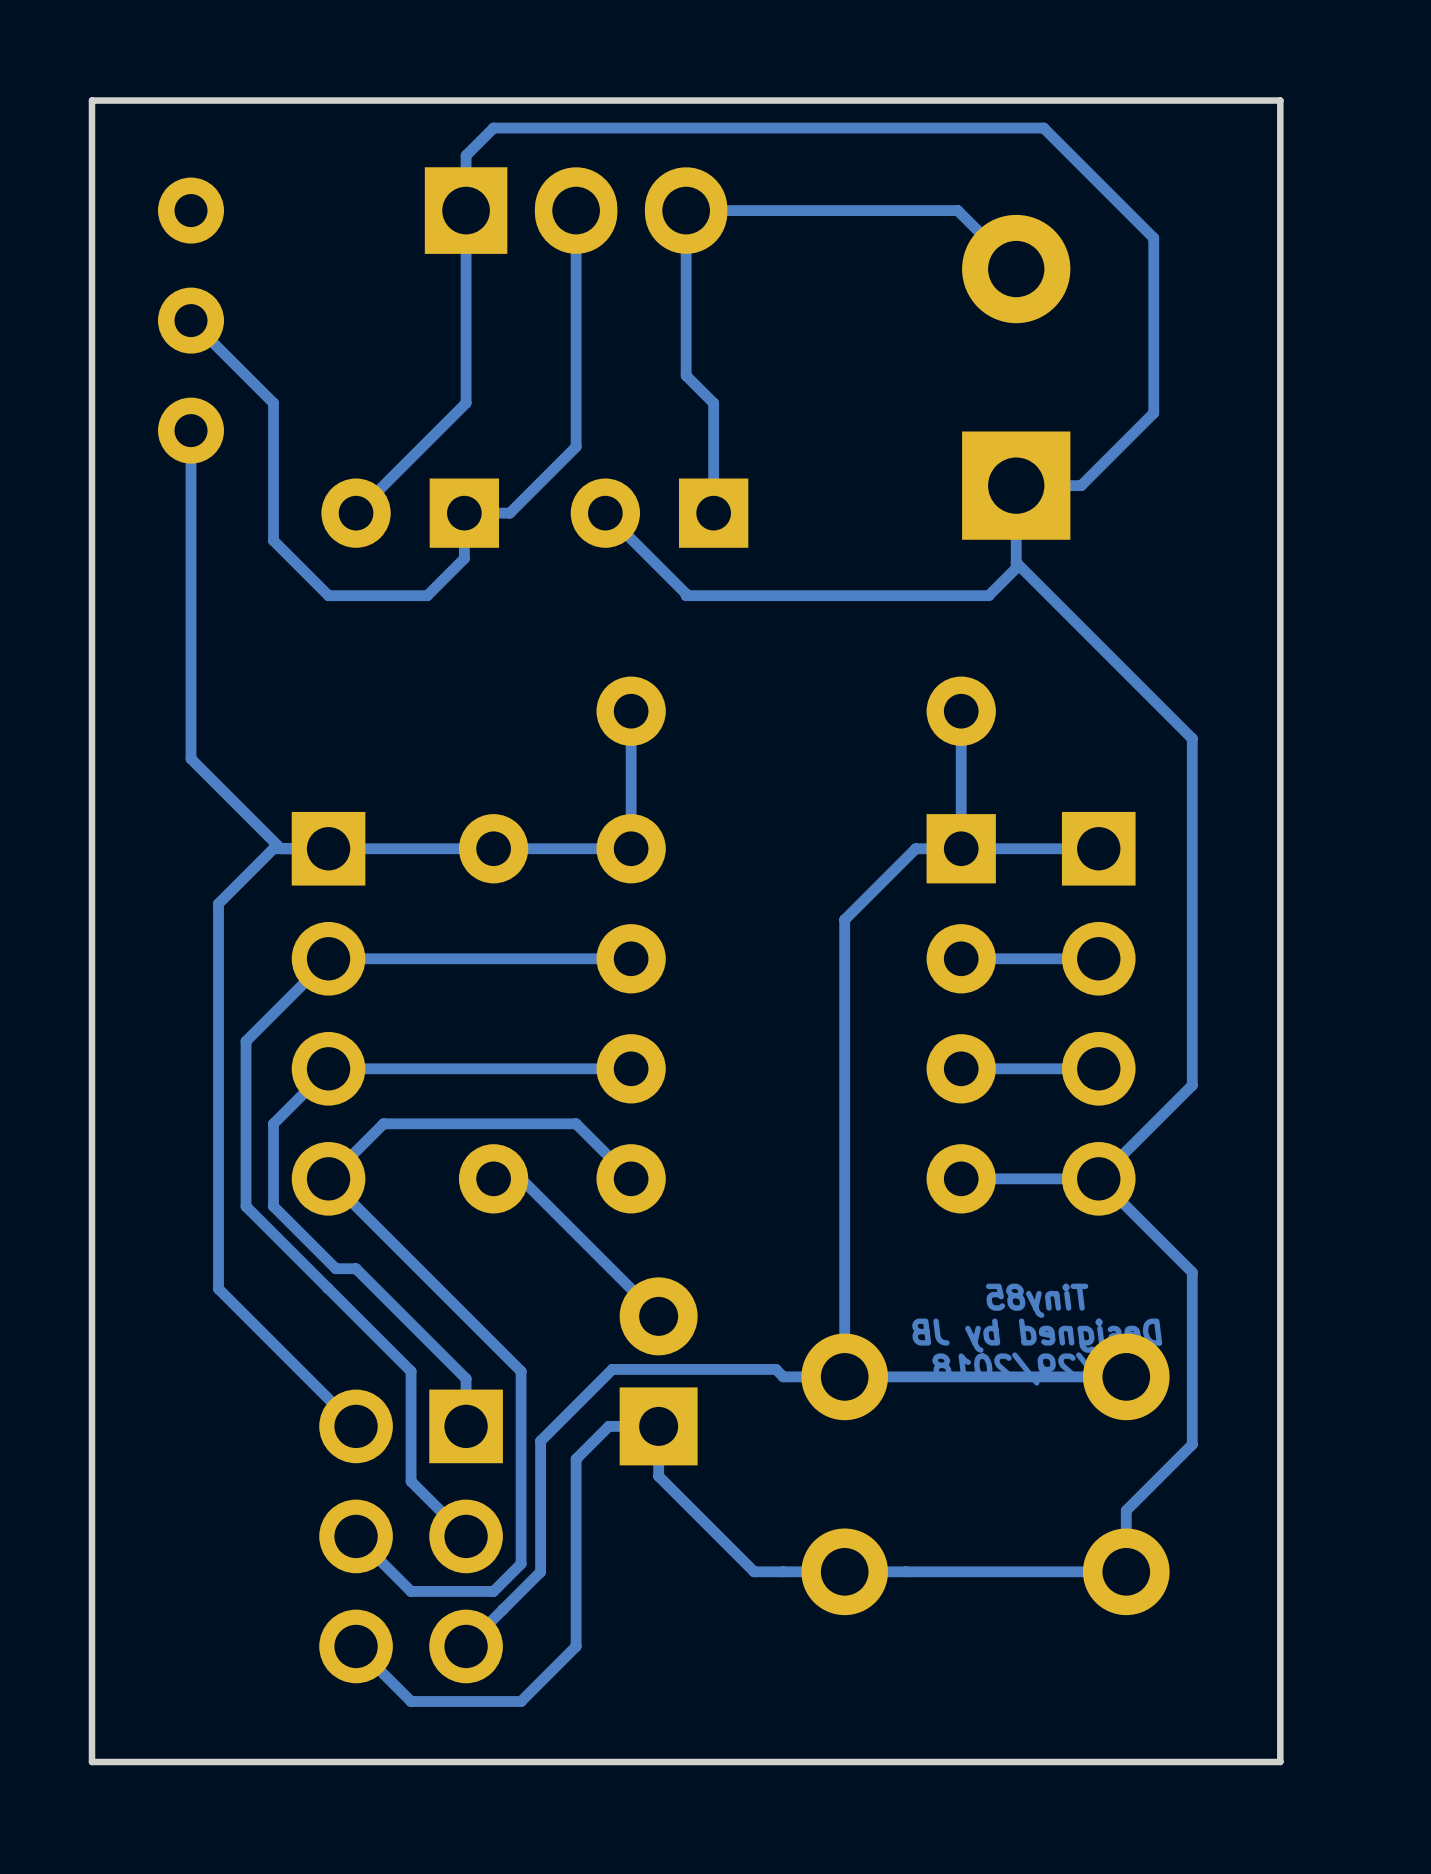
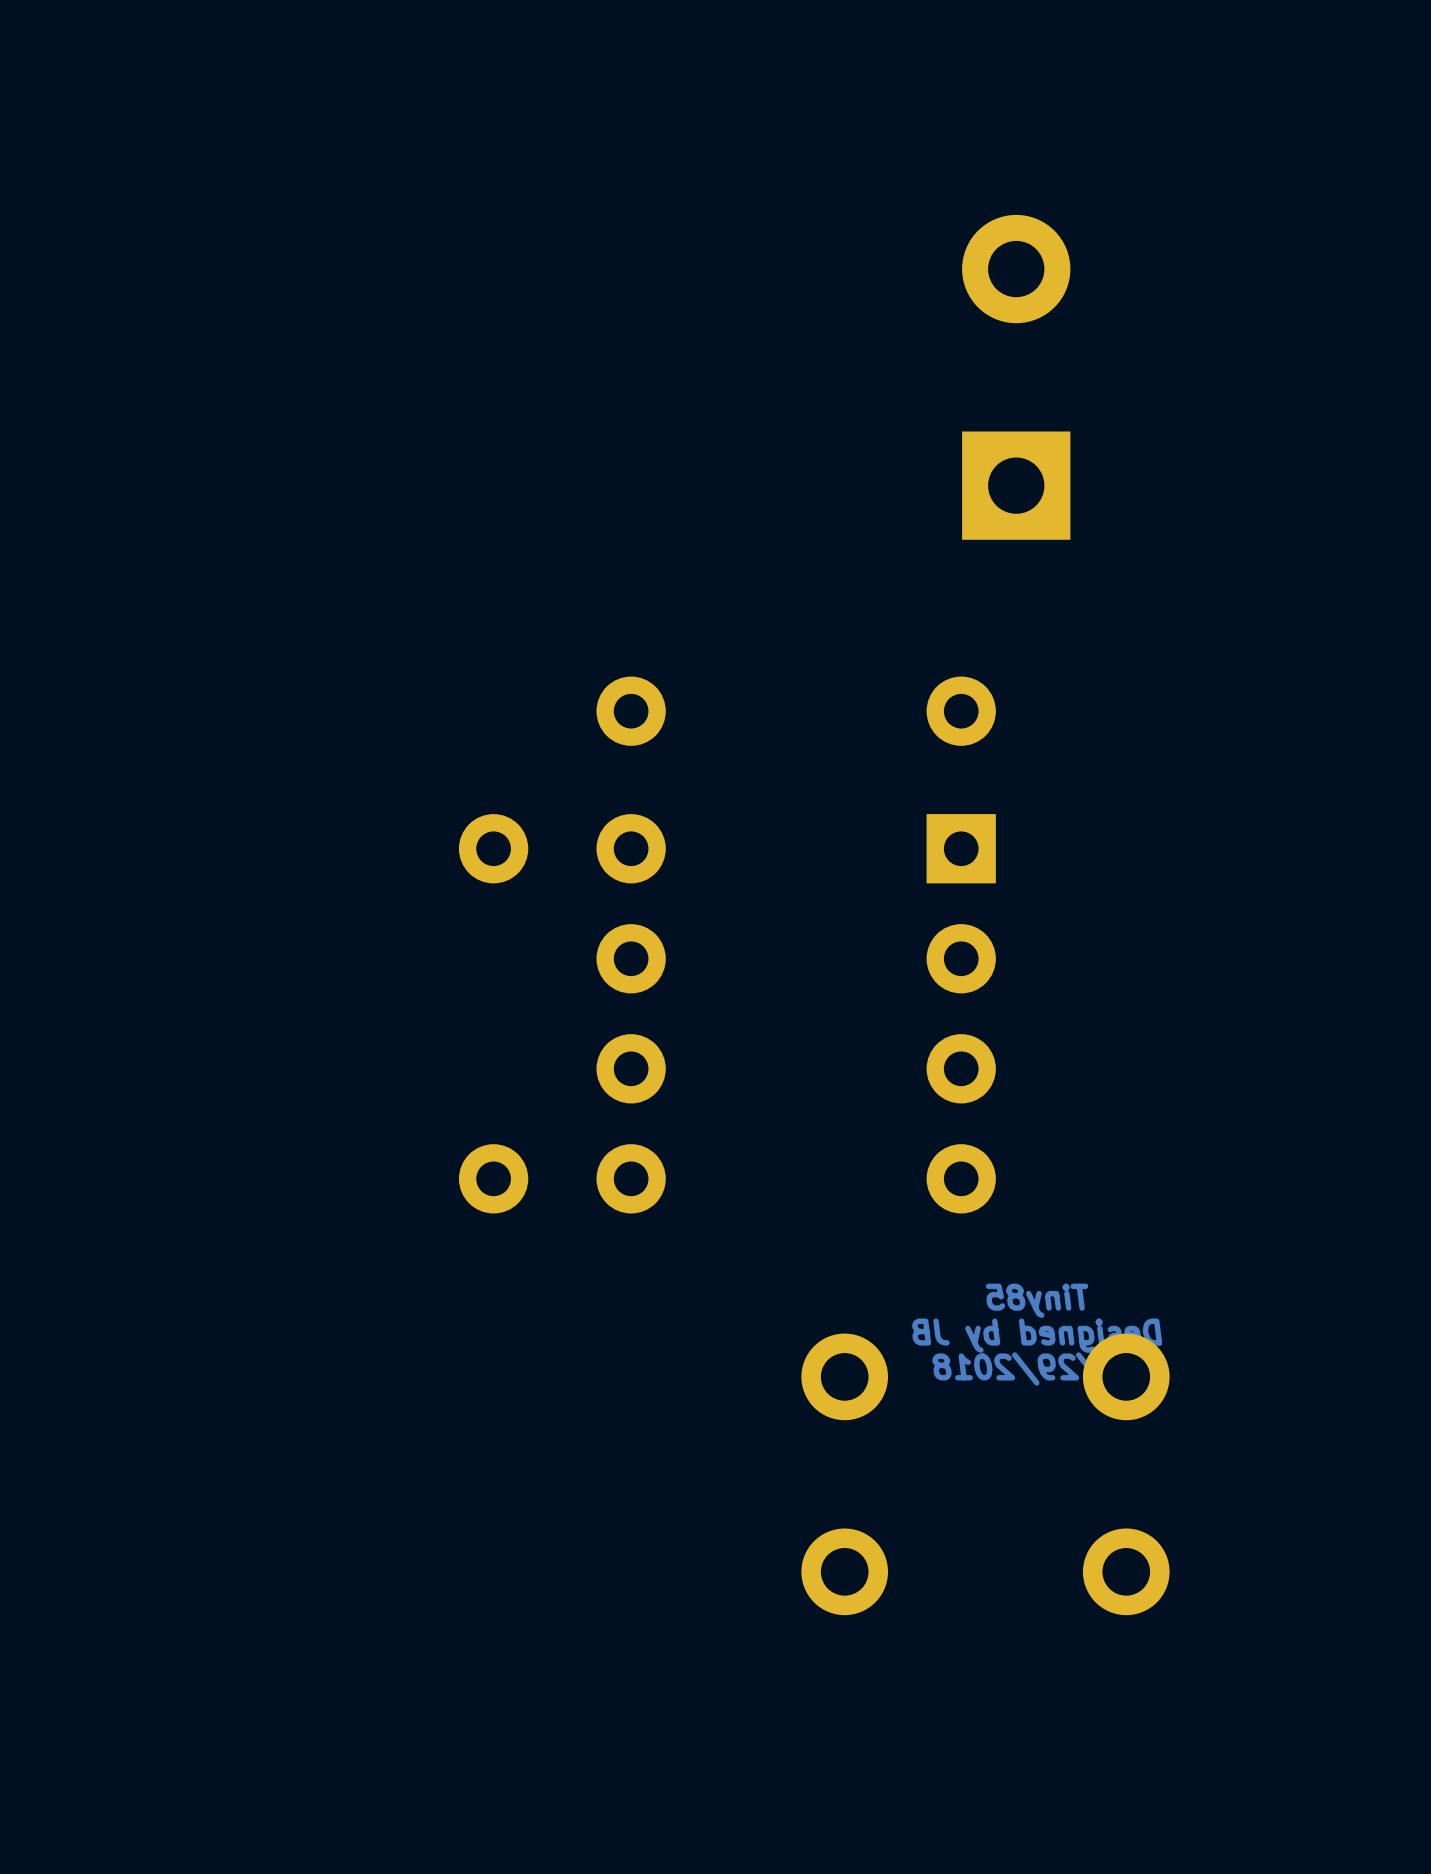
board edge: (1280, 100) (1280, 1761) (91, 1761) (91, 100) (1280, 100) -> none
track: (576, 210) (576, 446) (509, 513) (464, 513) (464, 558) (427, 595) (328, 595) (273, 540) (273, 403) (191, 320) -> none
part: (576, 210) -> none
track: (1016, 269) (957, 210) (686, 210) (686, 375) (713, 403) (713, 513) -> none
part: (191, 320) -> none
track: (191, 430) (191, 758) (280, 848) -> none
part: (410, 513) -> none
track: (605, 513) (686, 595) (988, 595) (1016, 568) (1016, 485) (1081, 485) (1153, 413) (1153, 238) (1043, 128) (493, 128) (466, 155) (466, 403) (356, 513) -> none
part: (659, 513) -> none
track: (1016, 562) (1192, 738) (1192, 1085) (1098, 1178) -> none
track: (631, 711) (631, 848) (273, 848) (218, 903) (218, 1288) (356, 1426) -> none
track: (961, 711) (961, 848) -> none
track: (1098, 848) (915, 848) (844, 919) (844, 1376) -> none
track: (631, 958) (328, 958) (246, 1041) (246, 1206) (411, 1371) (411, 1481) (466, 1536) -> none
track: (1098, 958) (961, 958) -> none
part: (328, 1013) -> none
part: (1098, 1013) -> none
track: (631, 1068) (328, 1068) (273, 1123) (273, 1206) (335, 1268) (356, 1268) (466, 1378) (466, 1426) -> none
track: (1098, 1068) (961, 1068) -> none
track: (493, 1178) (521, 1178) (658, 1316) -> none
track: (631, 1178) (576, 1123) (383, 1123) (328, 1178) (521, 1371) (521, 1563) (493, 1591) (411, 1591) (356, 1536) -> none
track: (1098, 1178) (961, 1178) -> none
track: (1098, 1178) (1192, 1272) (1192, 1444) (1126, 1510) (1126, 1571) (754, 1571) (658, 1476) (658, 1426) (608, 1426) (576, 1459) (576, 1646) (521, 1701) (411, 1701) (356, 1646) -> none
part: (658, 1371) -> none
track: (1126, 1376) (783, 1376) (775, 1369) (612, 1369) (540, 1441) (540, 1571) (466, 1646) -> none
part: (411, 1536) -> none

